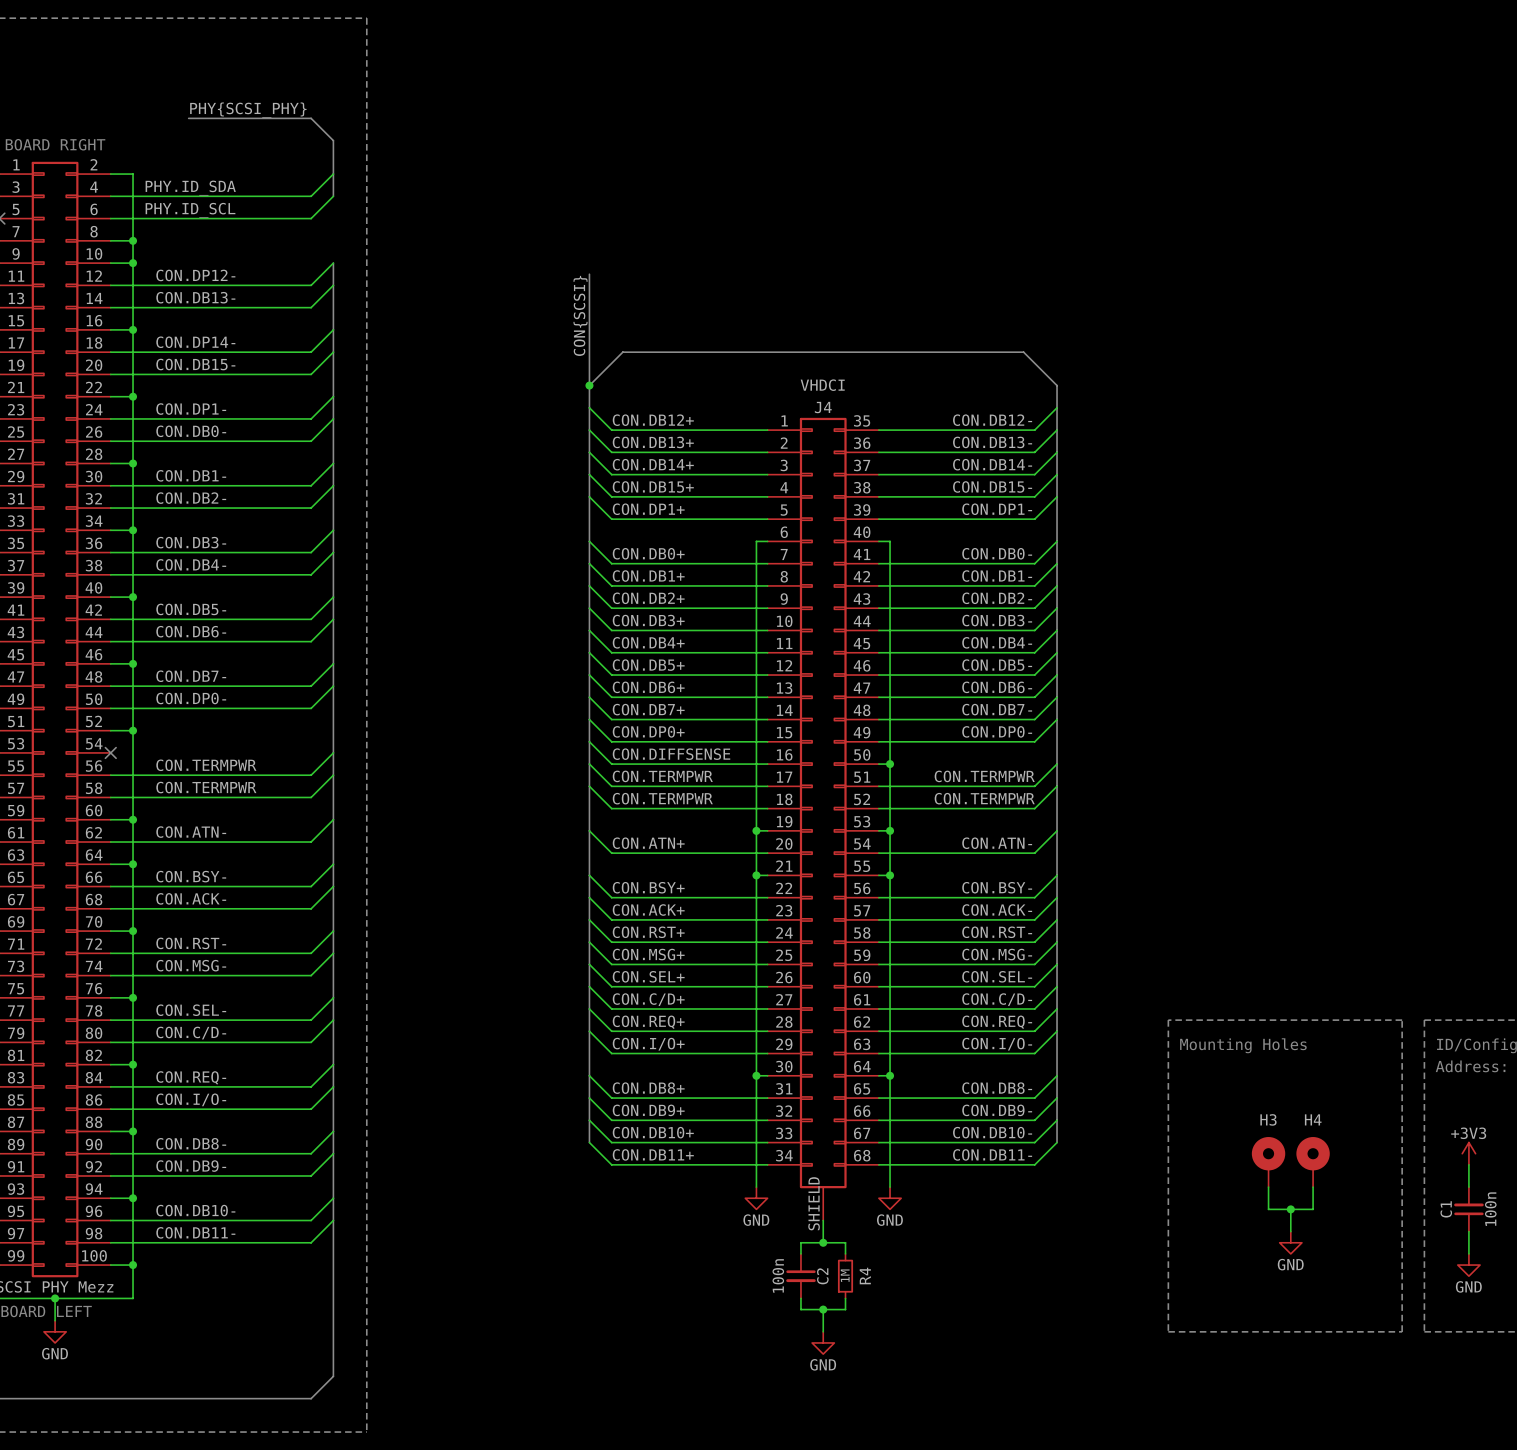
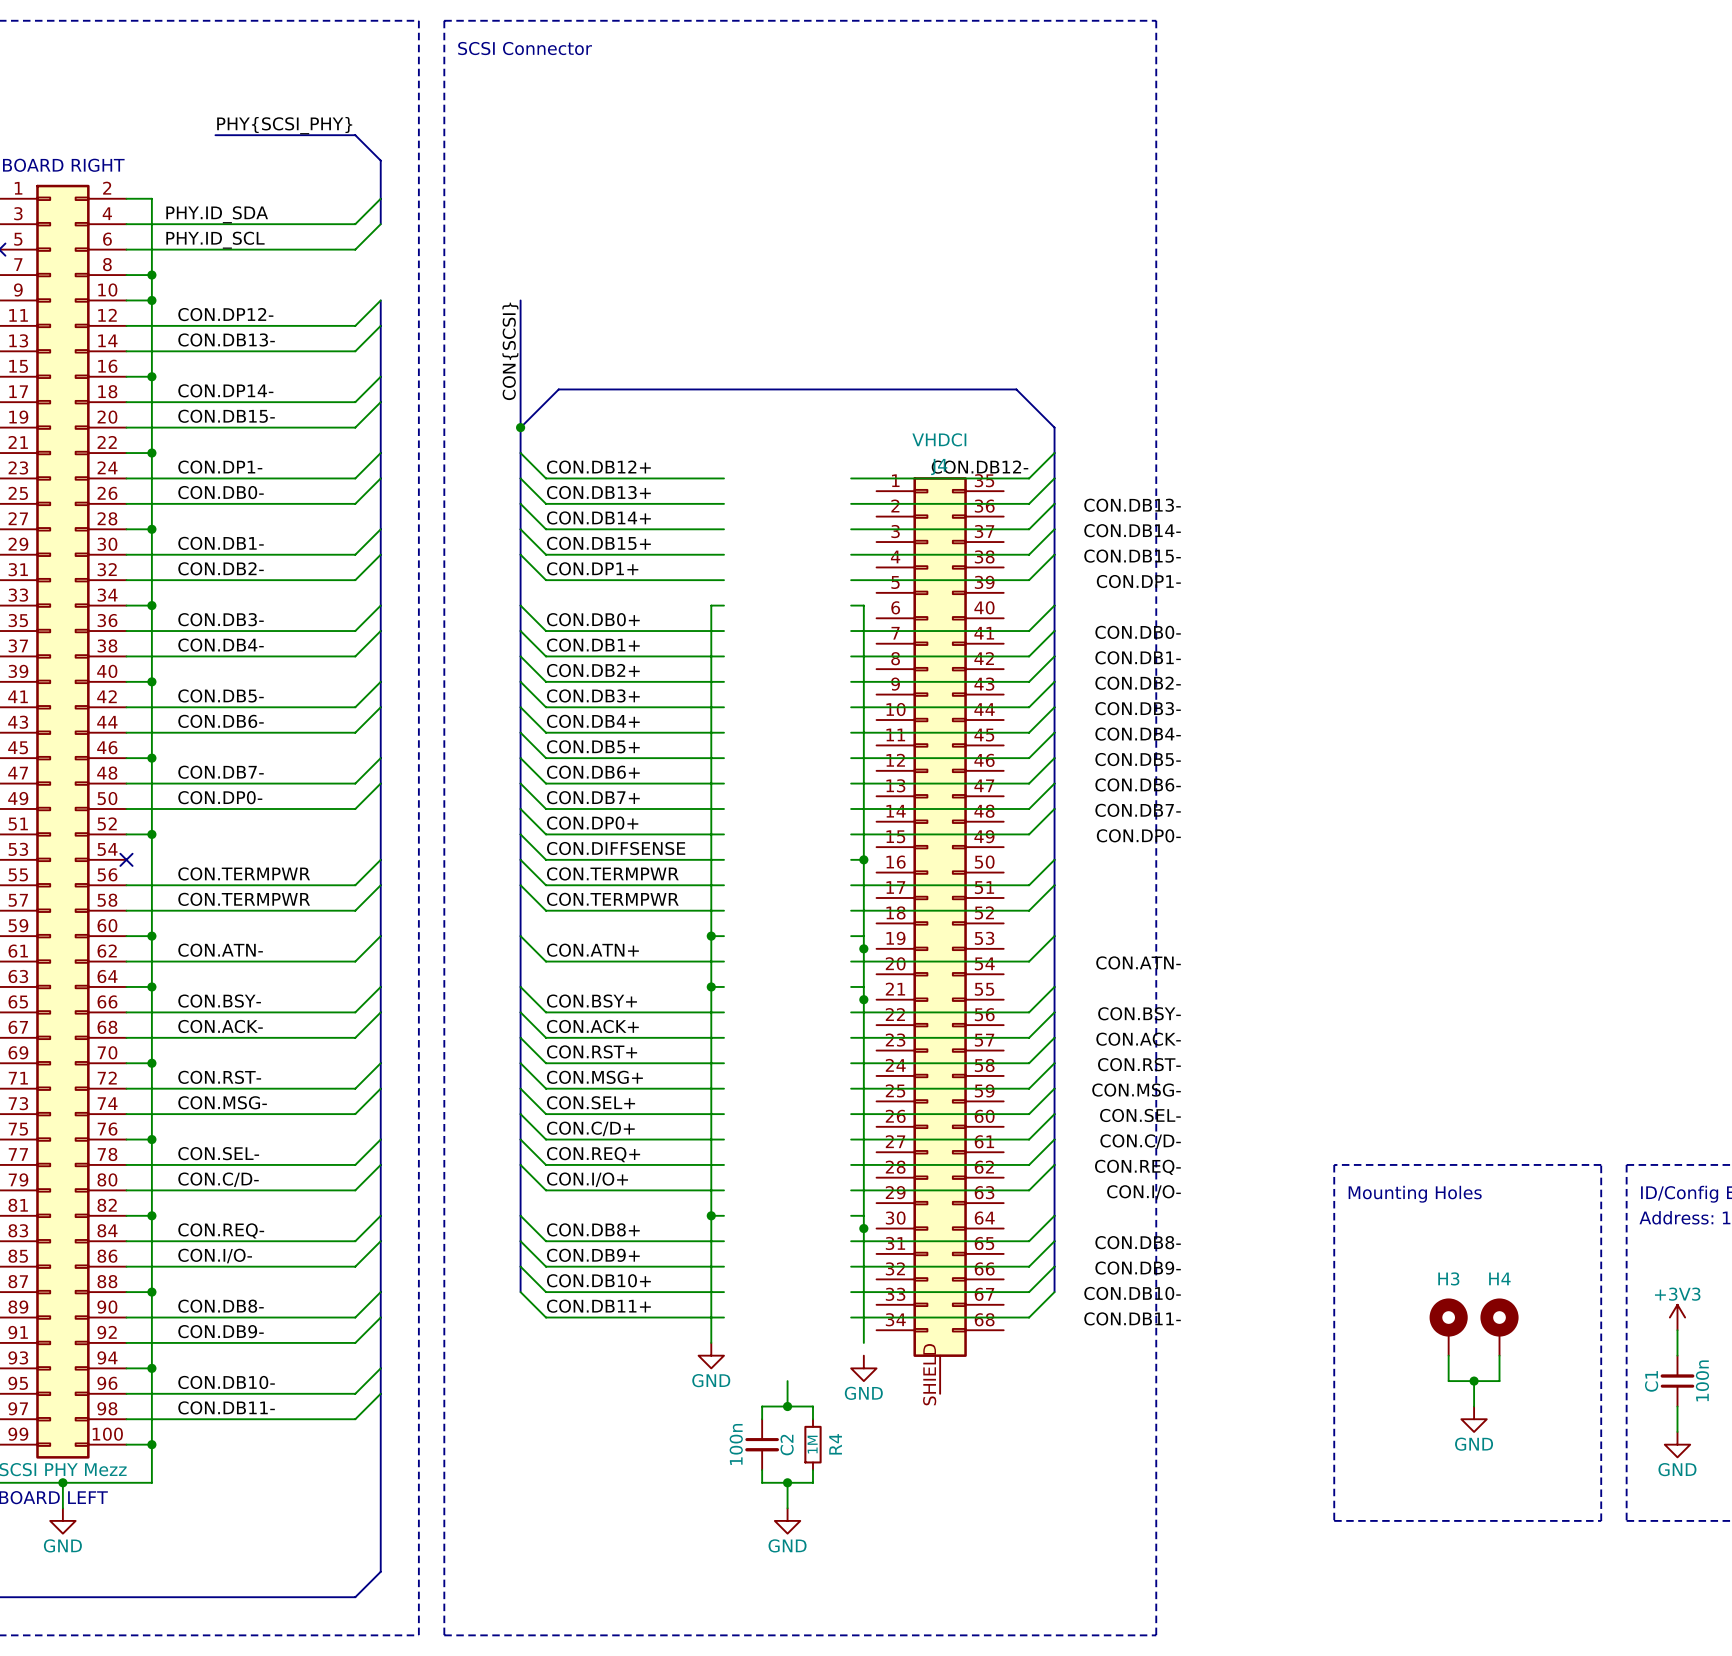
line: none -> (444, 20) (444, 1635) (1156, 1635) (1156, 20) (444, 20)
text: none -> SCSI Connector (525, 48)
bus: (589, 274) (589, 1142) -> (520, 300) (520, 1292)
label position: CON{SCSI} (580, 315) -> CON{SCSI} (510, 351)
junction: none -> (520, 427)
bus: (589, 385) (622, 352) (1023, 352) (1057, 385) (1057, 1142) -> (520, 427) (558, 389) (1016, 389) (1054, 427) (1054, 1292)
junction: (589, 385) -> none
wire: (589, 407) (611, 430) (767, 430) -> (520, 453) (546, 478) (724, 478)
wire: (1057, 407) (1034, 430) (878, 430) -> (1054, 453) (1029, 478) (851, 478)
label position: CON.DB12+ (653, 420) -> CON.DB12+ (598, 467)
label position: CON.DB12- (992, 420) -> CON.DB12- (980, 467)
wire: (589, 430) (611, 452) (767, 452) -> (520, 478) (546, 503) (724, 503)
wire: (1057, 430) (1034, 452) (878, 452) -> (1054, 478) (1029, 503) (851, 503)
label position: CON.DB13+ (653, 442) -> CON.DB13+ (598, 492)
wire: (589, 452) (611, 474) (767, 474) -> (520, 503) (546, 529) (724, 529)
wire: (1057, 452) (1034, 474) (878, 474) -> (1054, 503) (1029, 529) (851, 529)
label position: CON.DB14+ (653, 464) -> CON.DB14+ (598, 517)
wire: (589, 474) (611, 496) (767, 496) -> (520, 529) (546, 554) (724, 554)
wire: (1057, 474) (1034, 496) (878, 496) -> (1054, 529) (1029, 554) (851, 554)
label position: CON.DB15+ (653, 486) -> CON.DB15+ (598, 543)
wire: (589, 496) (611, 519) (767, 519) -> (520, 554) (546, 580) (724, 580)
wire: (1057, 496) (1034, 519) (878, 519) -> (1054, 554) (1029, 580) (851, 580)
label position: CON.DP1+ (648, 509) -> CON.DP1+ (592, 568)
wire: none -> (724, 605) (711, 605) (711, 1342)
wire: (589, 541) (611, 563) (767, 563) -> (520, 605) (546, 631) (724, 631)
wire: (756, 541) (767, 541) -> (863, 618) (863, 605) (851, 605)
wire: (878, 541) (890, 541) (890, 1187) -> none
wire: (1057, 541) (1034, 563) (878, 563) -> (1054, 605) (1029, 631) (851, 631)
label position: CON.DB0+ (648, 553) -> CON.DB0+ (593, 619)
wire: (589, 563) (611, 585) (767, 585) -> (520, 631) (546, 656) (724, 656)
wire: (1057, 563) (1034, 585) (878, 585) -> (1054, 631) (1029, 656) (851, 656)
label position: CON.DB1+ (648, 576) -> CON.DB1+ (593, 645)
wire: (589, 585) (611, 608) (767, 608) -> (520, 656) (546, 681) (724, 681)
wire: (1057, 585) (1034, 608) (878, 608) -> (1054, 656) (1029, 681) (851, 681)
label position: CON.DB2+ (648, 598) -> CON.DB2+ (593, 670)
wire: (589, 608) (611, 630) (767, 630) -> (520, 681) (546, 707) (724, 707)
wire: (1057, 608) (1034, 630) (878, 630) -> (1054, 681) (1029, 707) (851, 707)
label position: CON.DB3+ (648, 620) -> CON.DB3+ (593, 695)
wire: (589, 630) (611, 652) (767, 652) -> (520, 707) (546, 732) (724, 732)
wire: (1057, 630) (1034, 652) (878, 652) -> (1054, 707) (1029, 732) (851, 732)
label position: CON.DB4+ (648, 642) -> CON.DB4+ (593, 721)
wire: (589, 652) (611, 675) (767, 675) -> (520, 732) (546, 758) (724, 758)
wire: (1057, 652) (1034, 675) (878, 675) -> (1054, 732) (1029, 758) (851, 758)
label position: CON.DB5+ (648, 665) -> CON.DB5+ (593, 746)
wire: (589, 675) (611, 697) (767, 697) -> (520, 758) (546, 783) (724, 783)
wire: (1057, 675) (1034, 697) (878, 697) -> (1054, 758) (1029, 783) (851, 783)
label position: CON.DB6+ (648, 687) -> CON.DB6+ (593, 772)
wire: (589, 697) (611, 719) (767, 719) -> (520, 783) (546, 808) (724, 808)
wire: (1057, 697) (1034, 719) (878, 719) -> (1054, 783) (1029, 808) (851, 808)
label position: CON.DB7+ (648, 709) -> CON.DB7+ (593, 797)
wire: (589, 719) (611, 741) (767, 741) -> (520, 808) (546, 834) (724, 834)
wire: (1057, 719) (1034, 741) (878, 741) -> (1054, 808) (1029, 834) (851, 834)
label position: CON.DP0+ (648, 731) -> CON.DP0+ (592, 823)
wire: (589, 741) (611, 764) (767, 764) -> (520, 834) (546, 859) (724, 859)
junction: none -> (863, 859)
label position: CON.DIFFSENSE (671, 754) -> CON.DIFFSENSE (616, 848)
wire: (589, 764) (611, 786) (767, 786) -> (520, 859) (546, 885) (724, 885)
wire: (878, 764) (890, 764) -> (851, 859) (863, 859)
junction: (890, 764) -> none
wire: (1057, 764) (1034, 786) (878, 786) -> (1054, 859) (1029, 885) (851, 885)
label: none -> CON.TERMPWR (612, 873)
label: CON.TERMPWR (662, 776) -> none
label: CON.TERMPWR (984, 776) -> none
wire: (589, 786) (611, 808) (767, 808) -> (520, 885) (546, 910) (724, 910)
wire: (1057, 786) (1034, 808) (878, 808) -> (1054, 885) (1029, 910) (851, 910)
label: none -> CON.TERMPWR (612, 899)
label: CON.TERMPWR (662, 798) -> none
label: CON.TERMPWR (984, 798) -> none
junction: none -> (711, 936)
wire: (589, 830) (611, 853) (767, 853) -> (520, 936) (546, 961) (724, 961)
wire: (756, 830) (767, 830) -> (711, 936) (724, 936)
wire: (878, 830) (890, 830) -> (851, 936) (863, 936)
junction: (890, 830) -> none
wire: (1057, 830) (1034, 853) (878, 853) -> (1054, 936) (1029, 961) (851, 961)
label position: CON.ATN+ (648, 843) -> CON.ATN+ (592, 950)
junction: none -> (711, 986)
wire: (589, 875) (611, 897) (767, 897) -> (520, 986) (546, 1012) (724, 1012)
wire: (756, 875) (767, 875) -> (711, 986) (724, 986)
wire: (878, 875) (890, 875) -> (851, 986) (863, 986)
junction: (890, 875) -> none
wire: (1057, 875) (1034, 897) (878, 897) -> (1054, 986) (1029, 1012) (851, 1012)
label position: CON.BSY+ (648, 887) -> CON.BSY+ (591, 1001)
wire: (589, 897) (611, 919) (767, 919) -> (520, 1012) (546, 1037) (724, 1037)
wire: (1057, 897) (1034, 919) (878, 919) -> (1054, 1012) (1029, 1037) (851, 1037)
label position: CON.ACK+ (648, 910) -> CON.ACK+ (592, 1026)
wire: (589, 919) (611, 942) (767, 942) -> (520, 1037) (546, 1063) (724, 1063)
wire: (1057, 919) (1034, 942) (878, 942) -> (1054, 1037) (1029, 1063) (851, 1063)
label position: CON.RST+ (648, 932) -> CON.RST+ (592, 1051)
wire: (589, 942) (611, 964) (767, 964) -> (520, 1063) (546, 1088) (724, 1088)
wire: (1057, 942) (1034, 964) (878, 964) -> (1054, 1063) (1029, 1088) (851, 1088)
label position: CON.MSG+ (648, 954) -> CON.MSG+ (594, 1077)
wire: (589, 964) (611, 986) (767, 986) -> (520, 1088) (546, 1114) (724, 1114)
wire: (1057, 964) (1034, 986) (878, 986) -> (1054, 1088) (1029, 1114) (851, 1114)
label position: CON.SEL+ (648, 976) -> CON.SEL+ (591, 1102)
wire: (589, 986) (611, 1008) (767, 1008) -> (520, 1114) (546, 1139) (724, 1139)
wire: (1057, 986) (1034, 1008) (878, 1008) -> (1054, 1114) (1029, 1139) (851, 1139)
label position: CON.C/D+ (648, 999) -> CON.C/D+ (590, 1128)
wire: (589, 1008) (611, 1031) (767, 1031) -> (520, 1139) (546, 1164) (724, 1164)
wire: (1057, 1008) (1034, 1031) (878, 1031) -> (1054, 1139) (1029, 1164) (851, 1164)
label position: CON.REQ+ (648, 1022) -> CON.REQ+ (593, 1154)
wire: (589, 1031) (611, 1053) (767, 1053) -> (520, 1164) (546, 1190) (724, 1190)
wire: (1057, 1031) (1034, 1053) (878, 1053) -> (1054, 1164) (1029, 1190) (851, 1190)
label position: CON.I/O+ (648, 1044) -> CON.I/O+ (587, 1179)
junction: none -> (711, 1215)
wire: (589, 1075) (611, 1098) (767, 1098) -> (520, 1215) (546, 1241) (724, 1241)
wire: (756, 1075) (767, 1075) -> (711, 1215) (724, 1215)
wire: (878, 1075) (890, 1075) -> (851, 1215) (863, 1215)
junction: (890, 1075) -> none
wire: (1057, 1075) (1034, 1098) (878, 1098) -> (1054, 1215) (1029, 1241) (851, 1241)
label position: CON.DB8+ (648, 1088) -> CON.DB8+ (593, 1229)
wire: (589, 1098) (611, 1120) (767, 1120) -> (520, 1241) (546, 1266) (724, 1266)
wire: (1057, 1098) (1034, 1120) (878, 1120) -> (1054, 1241) (1029, 1266) (851, 1266)
label position: CON.DB9+ (648, 1110) -> CON.DB9+ (593, 1255)
wire: (589, 1120) (611, 1142) (767, 1142) -> (520, 1266) (546, 1292) (724, 1292)
wire: (1057, 1120) (1034, 1142) (878, 1142) -> (1054, 1266) (1029, 1292) (851, 1292)
label position: CON.DB10+ (653, 1132) -> CON.DB10+ (598, 1280)
wire: (589, 1142) (611, 1164) (767, 1164) -> (520, 1292) (546, 1317) (724, 1317)
wire: (1057, 1142) (1034, 1164) (878, 1164) -> (1054, 1292) (1029, 1317) (851, 1317)
label position: CON.DB11+ (653, 1154) -> CON.DB11+ (598, 1306)
wire: (756, 1175) (756, 1187) -> none
power symbol: none -> GND (711, 1355)
power symbol: GND (890, 1198) -> none
wire: (823, 1220) (823, 1242) -> (787, 1381) (787, 1406)
junction: none -> (787, 1406)
junction: (823, 1242) -> none
wire: (800, 1253) (800, 1242) (845, 1242) (845, 1253) -> (762, 1419) (762, 1406) (812, 1406) (812, 1419)
C2 position: (800, 1276) -> (762, 1444)
R4 position: (845, 1276) -> (812, 1444)
junction: none -> (787, 1482)
wire: (800, 1298) (800, 1309) (845, 1309) (845, 1298) -> (762, 1470) (762, 1482) (812, 1482) (812, 1470)
wire: (823, 1309) (823, 1331) -> (787, 1482) (787, 1508)
junction: (823, 1309) -> none
power symbol: none -> GND (787, 1520)
power symbol: GND (823, 1342) -> none

